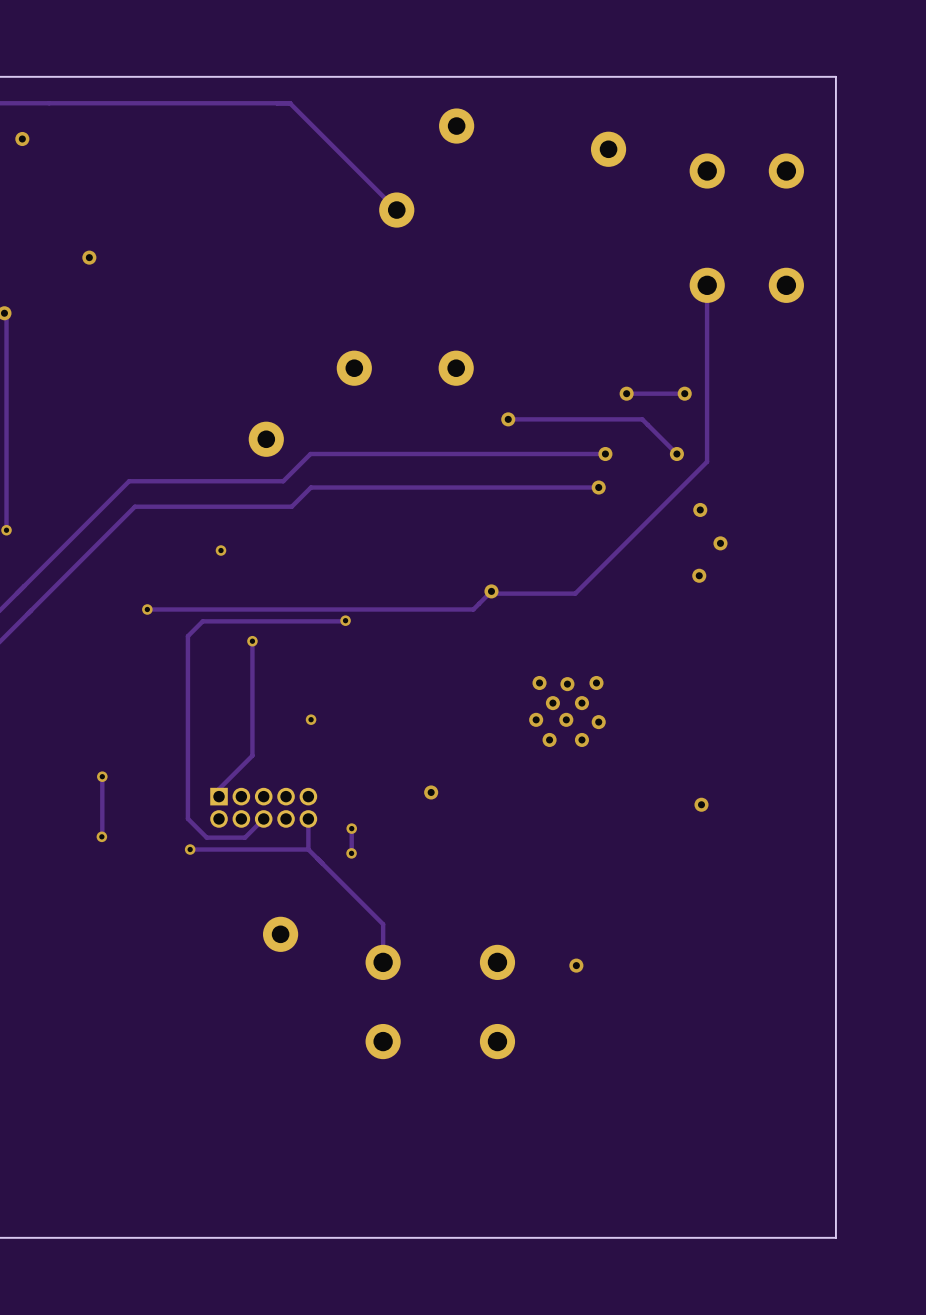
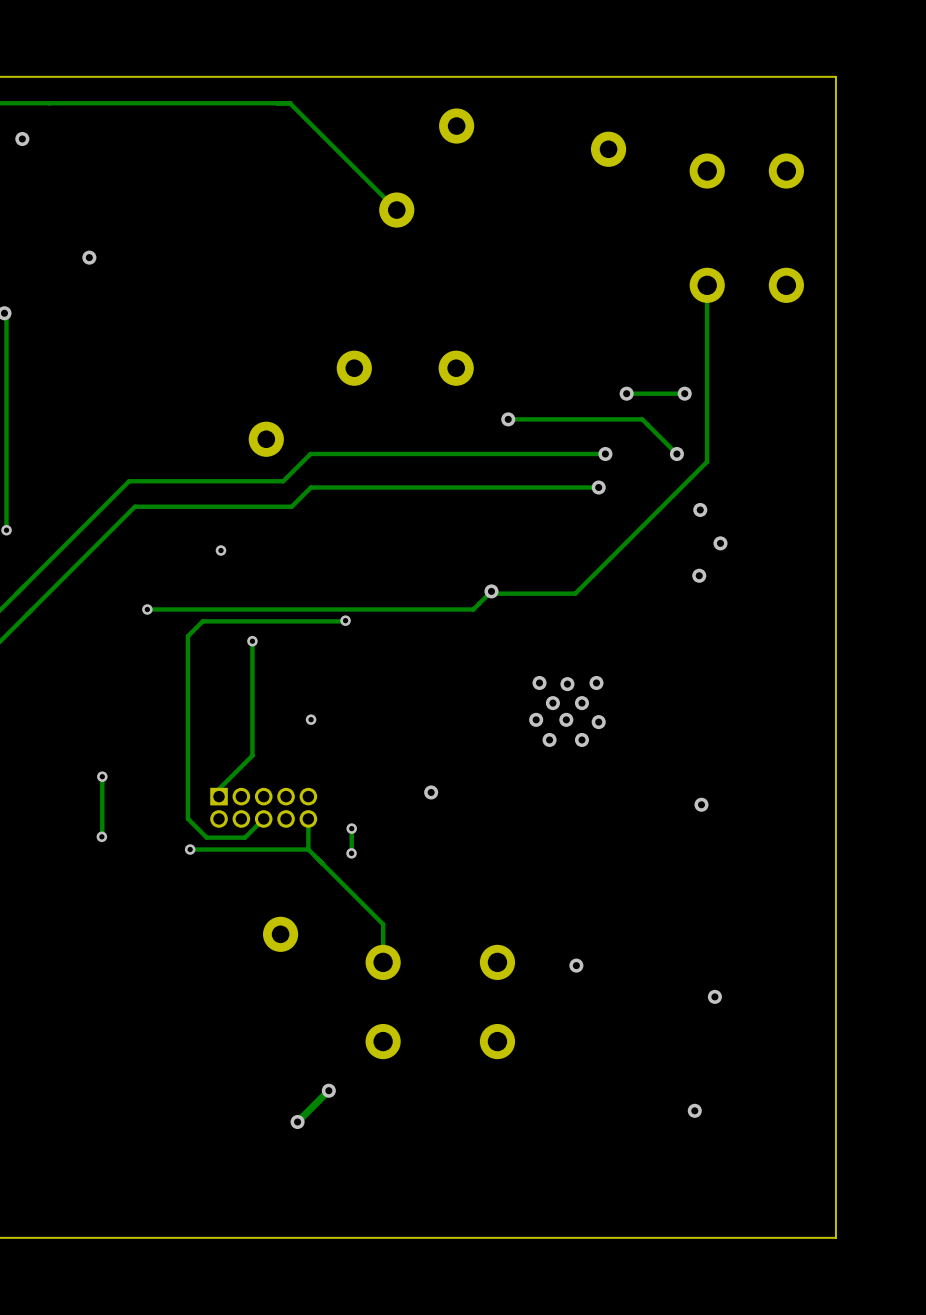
via: none -> (714, 996)
track: none -> (328, 1090) (297, 1121)
via: none -> (328, 1090)
via: none -> (694, 1110)
via: none -> (297, 1121)

